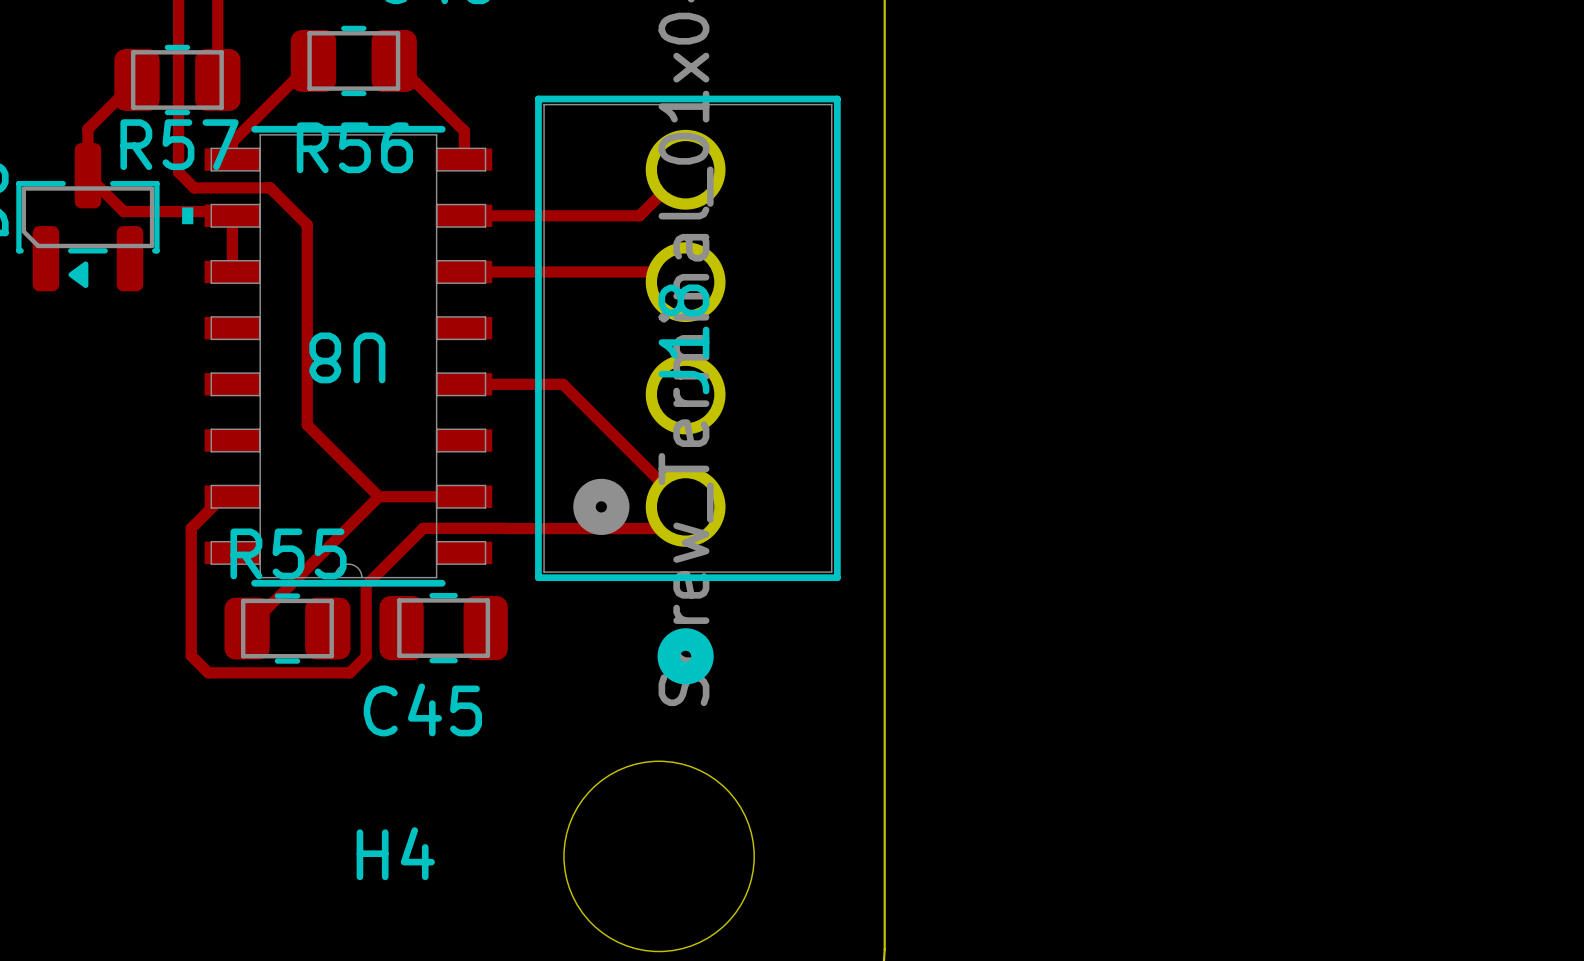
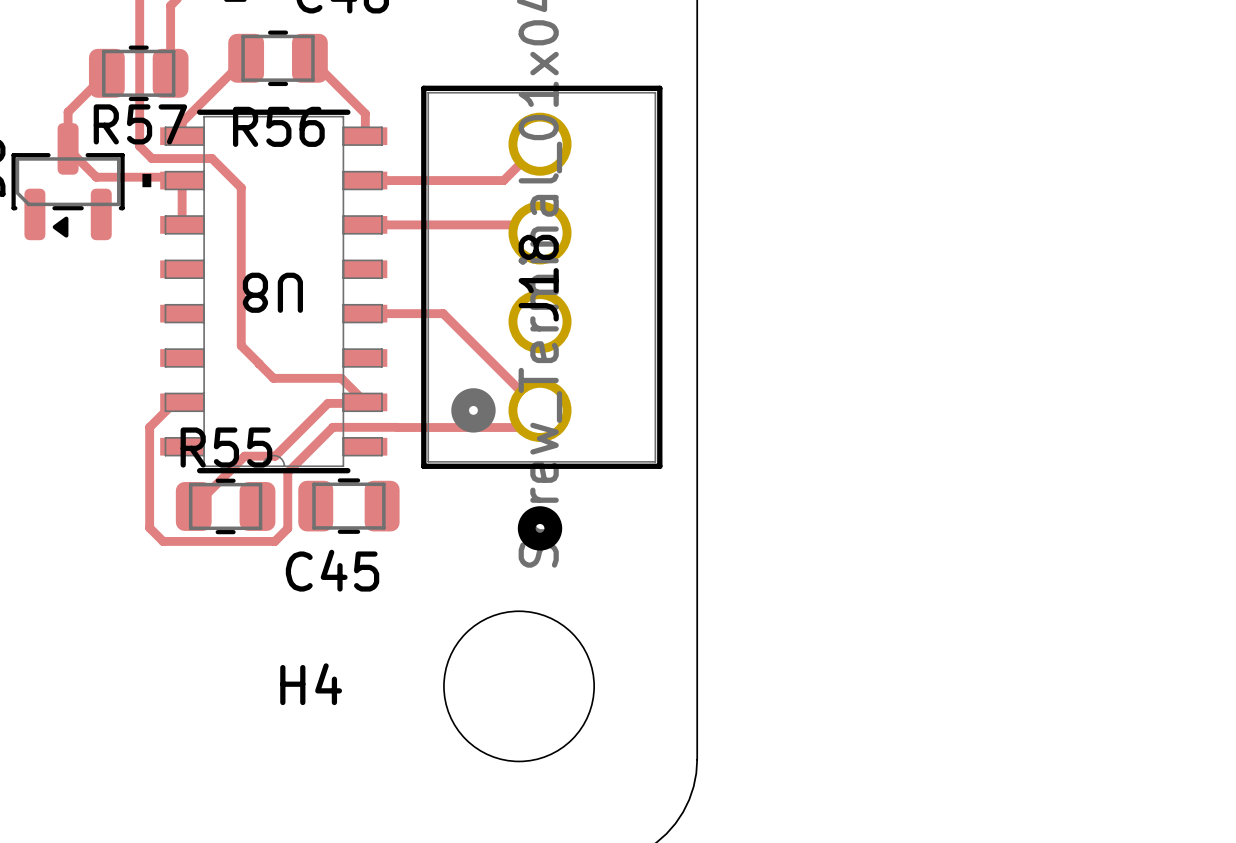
track: (329, 447) (378, 496) -> none
track: (378, 496) (247, 628) -> (259, 363) (273, 378) (341, 378) (365, 402) (327, 403) (275, 456) (244, 456) (193, 506)
track: (378, 496) (464, 496) -> none

